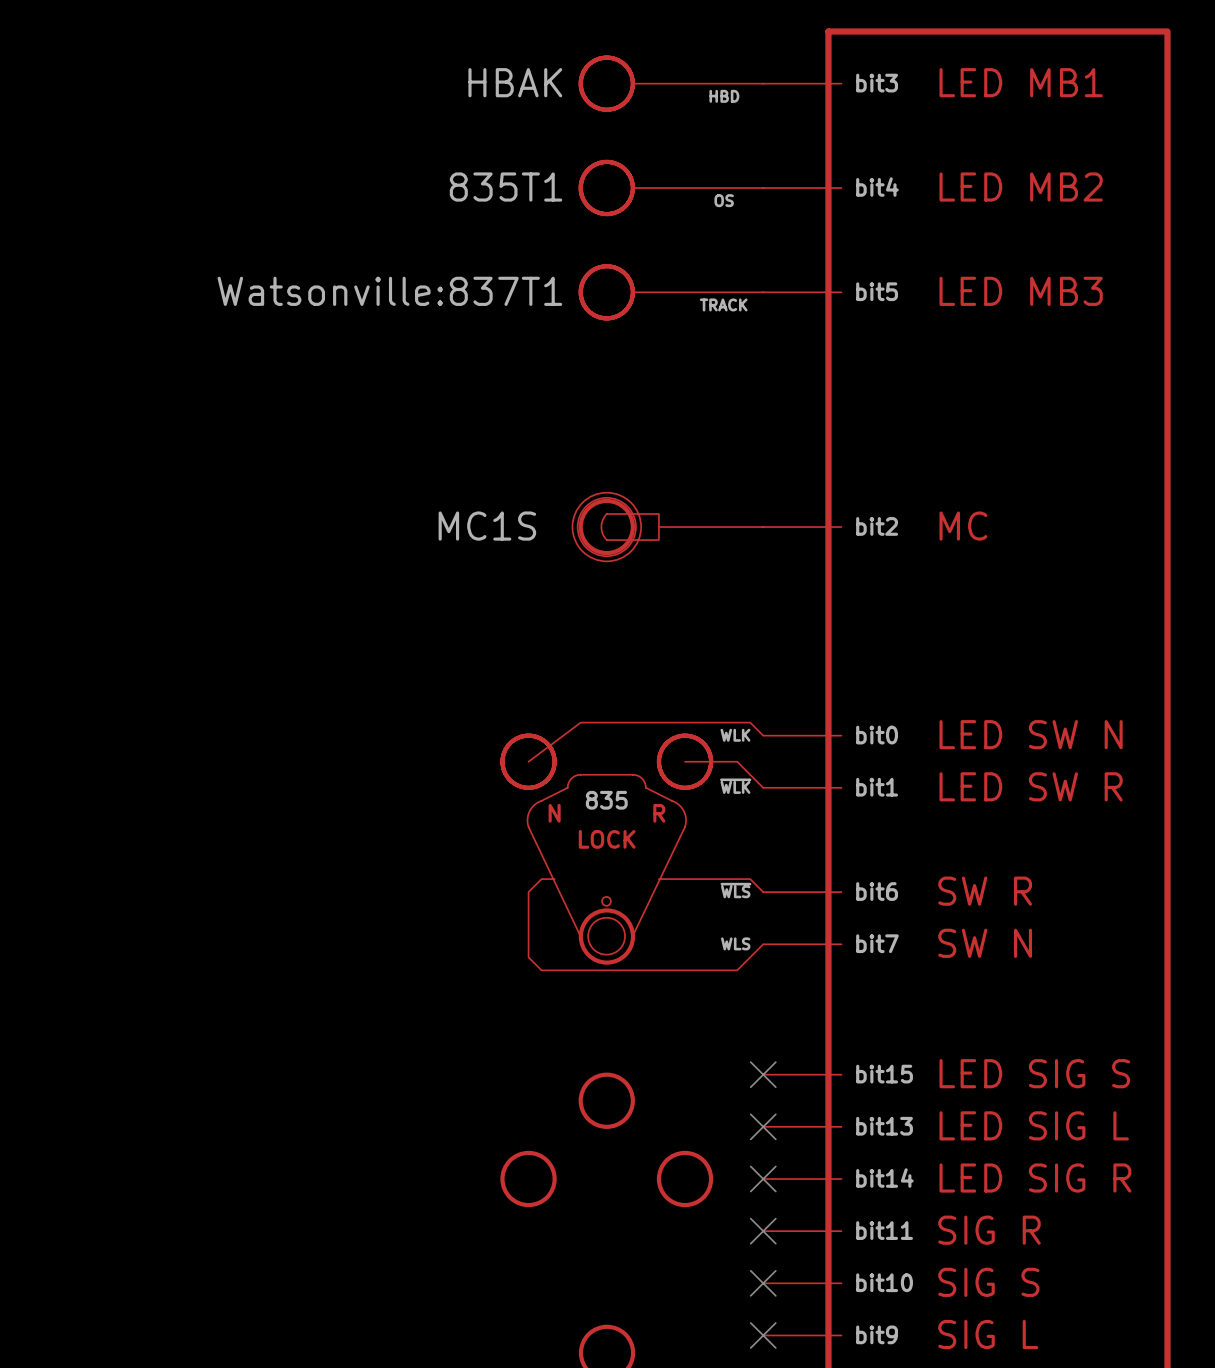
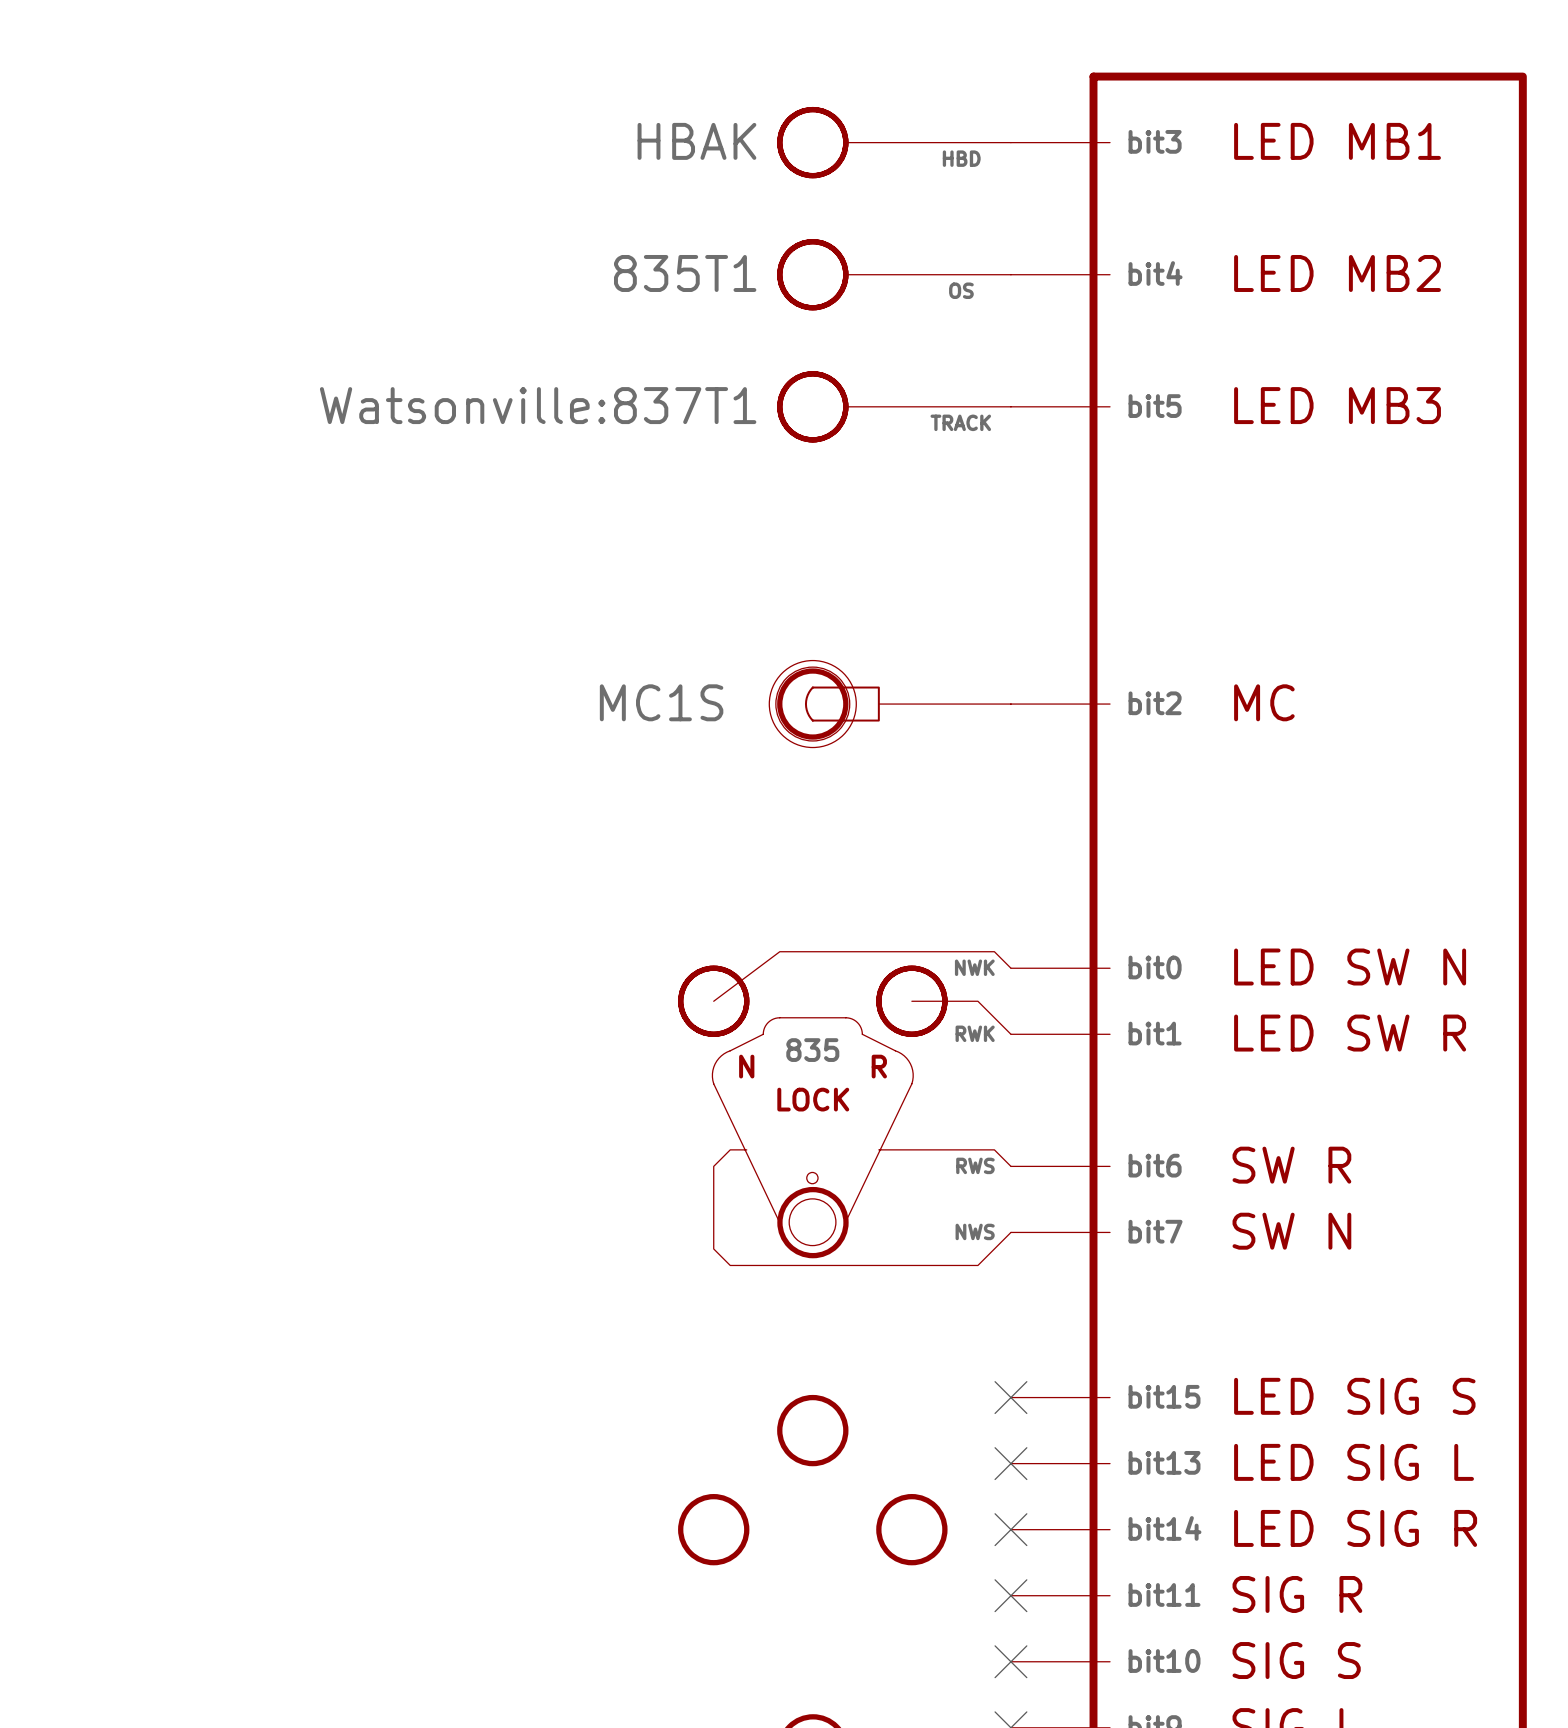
part pin name: WLK (735, 735) -> NWK (974, 967)
part pin name: ~{WLK} (735, 786) -> RWK (975, 1033)
part pin name: ~{WLS} (735, 890) -> RWS (975, 1165)
part pin name: WLS (735, 943) -> NWS (975, 1231)

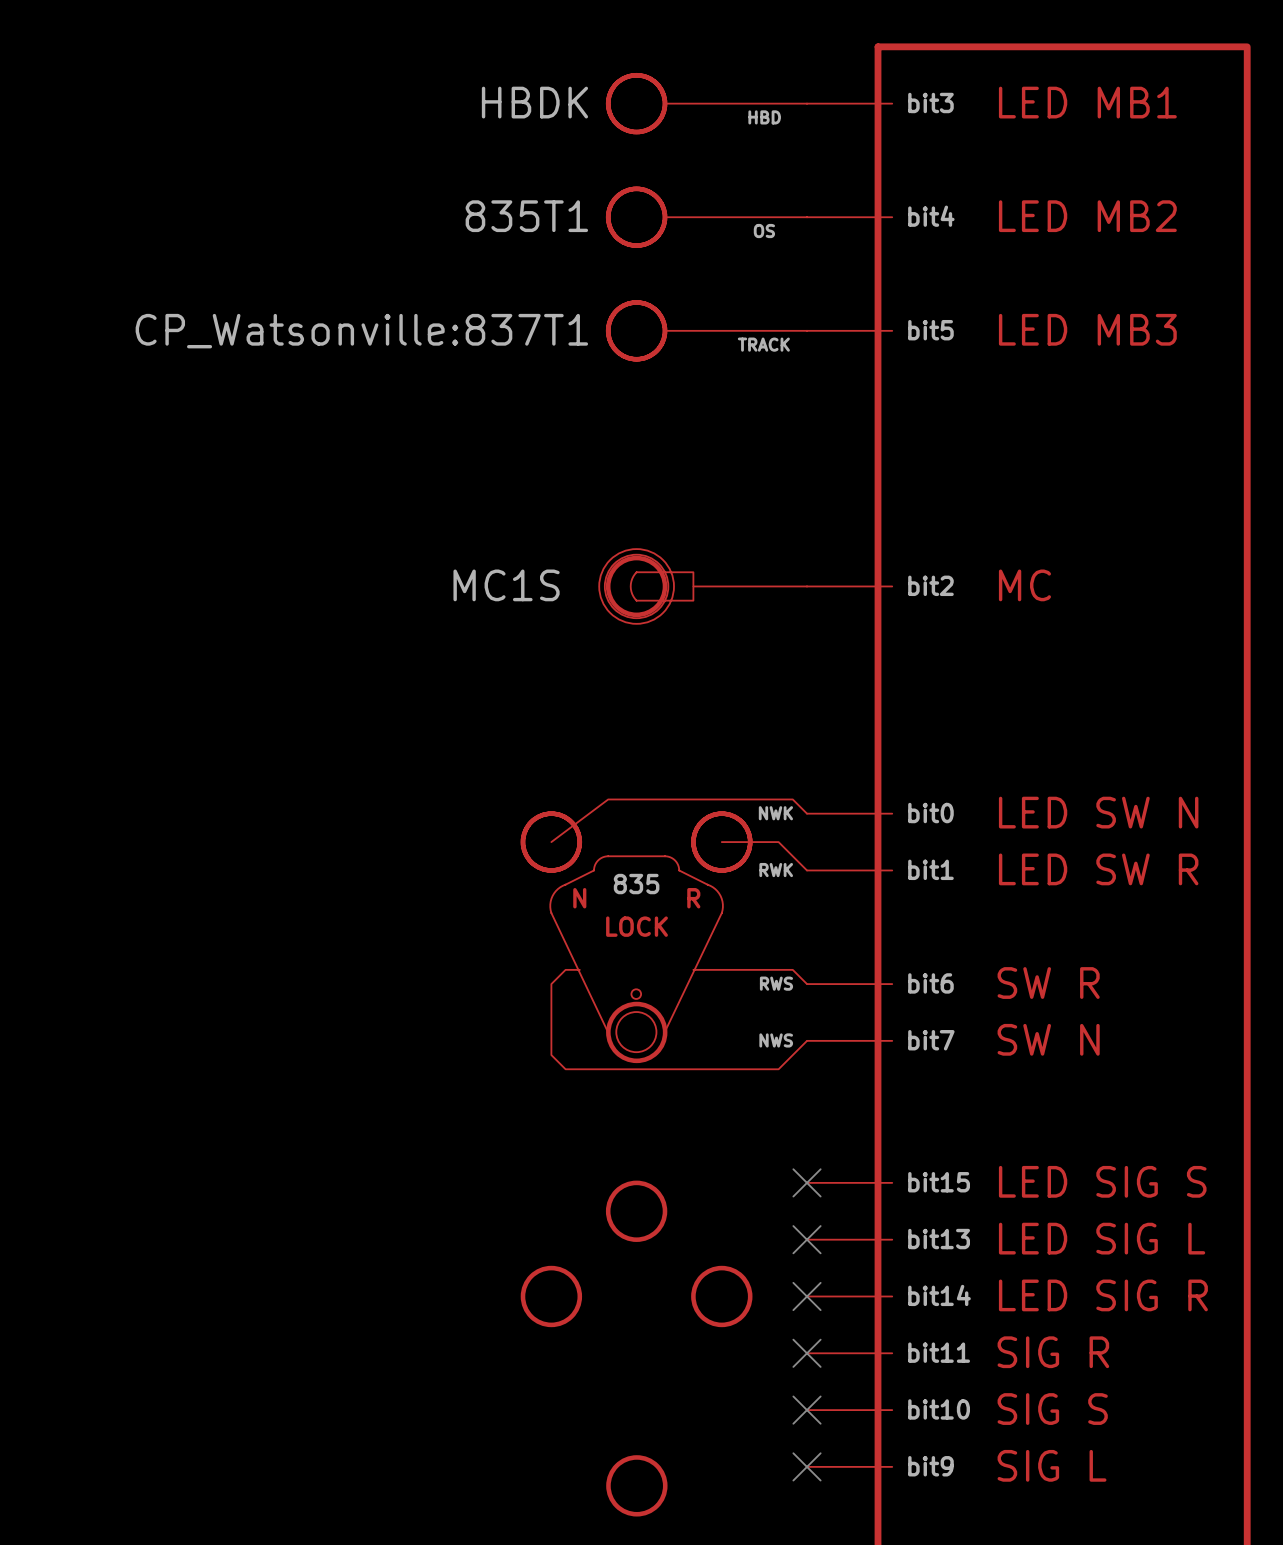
part text: HBAK (696, 141) -> HBDK (534, 102)
part text: Watsonville:837T1 (538, 405) -> CP_Watsonville:837T1 (361, 331)

